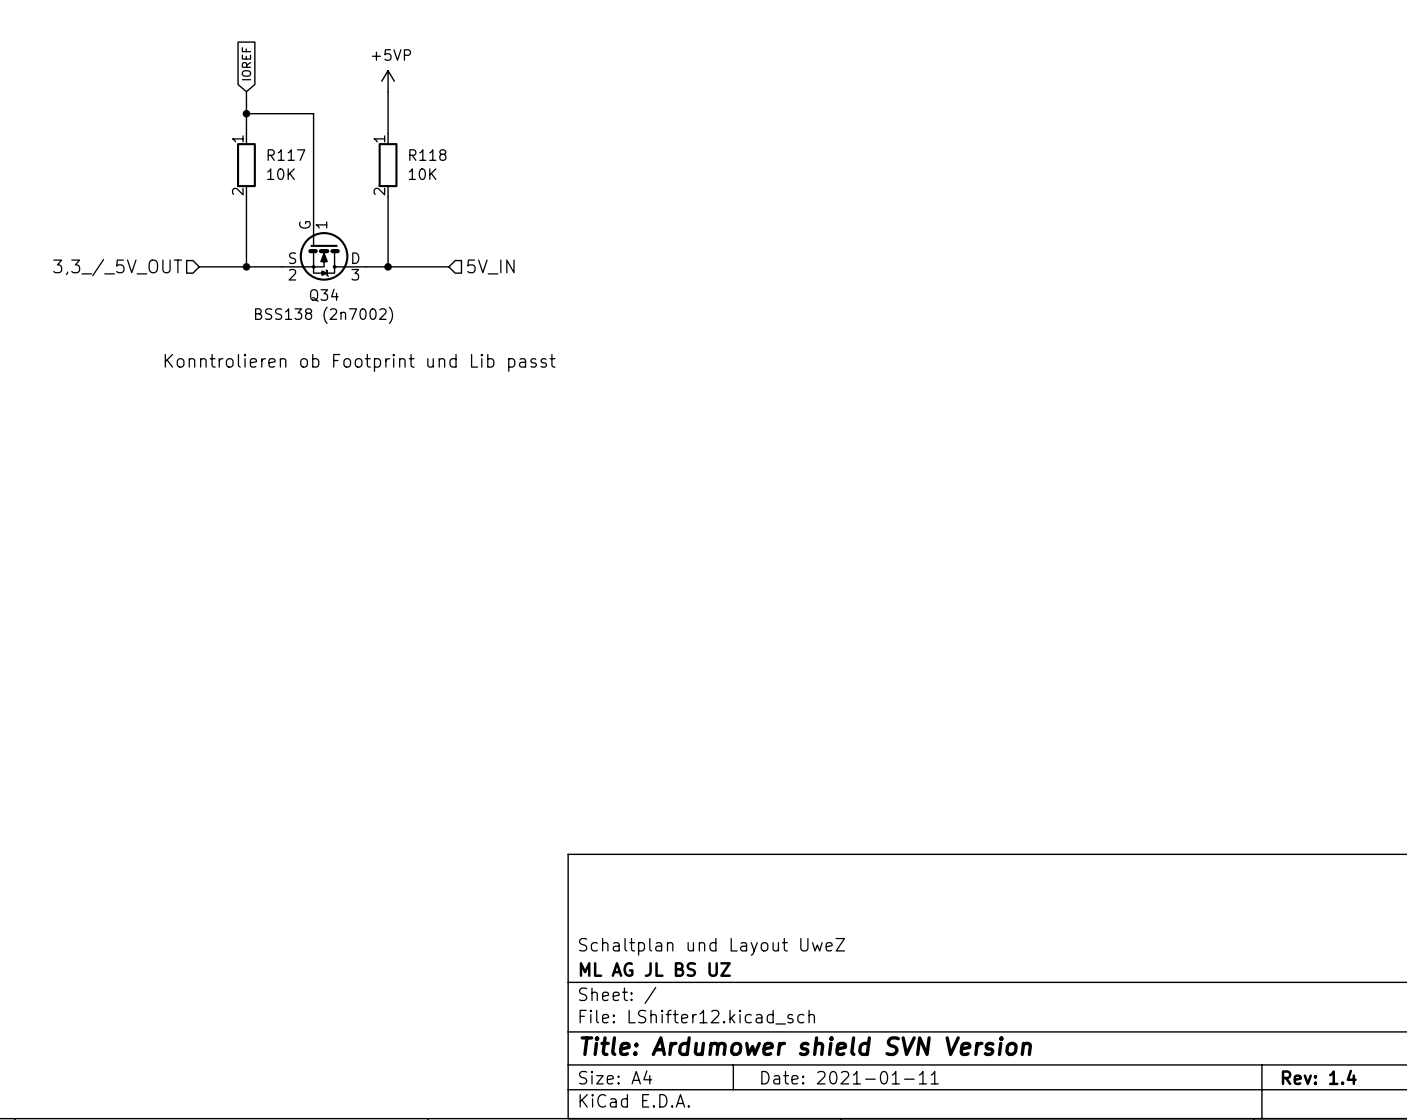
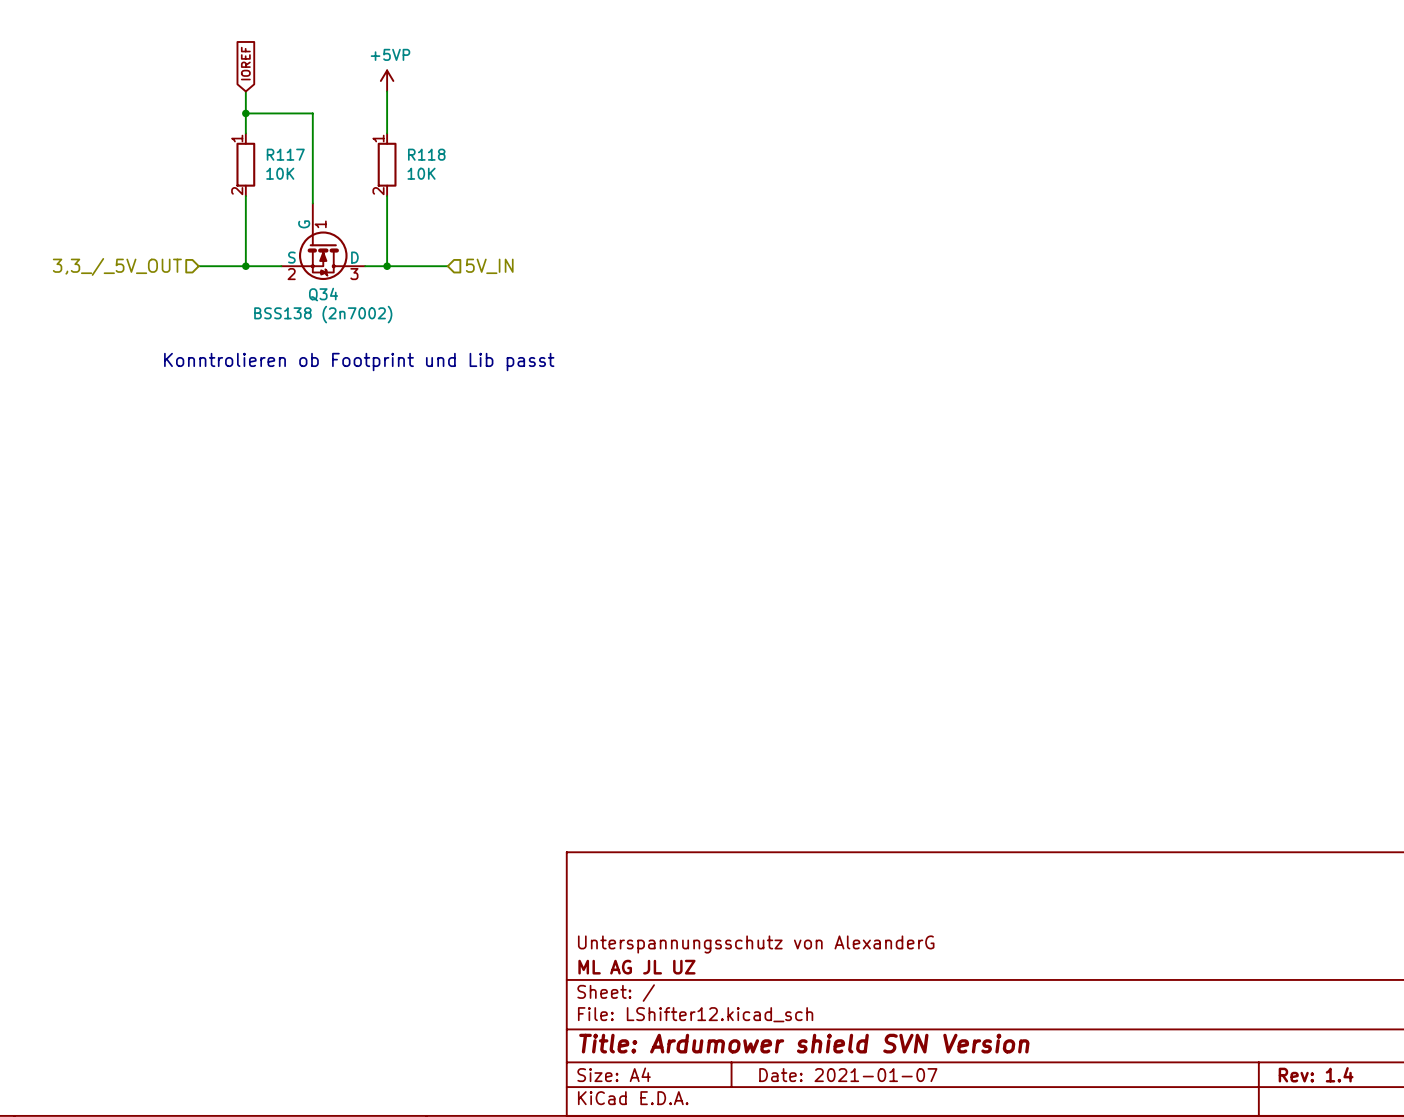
title block: Schaltplan und Layout UweZ (712, 946) -> Unterspannungsschutz von AlexanderG (756, 944)
title block: ML AG JL BS UZ (655, 969) -> ML AG JL UZ (636, 967)
title block: Date: 2021-01-11 (850, 1077) -> Date: 2021-01-07 (848, 1075)

